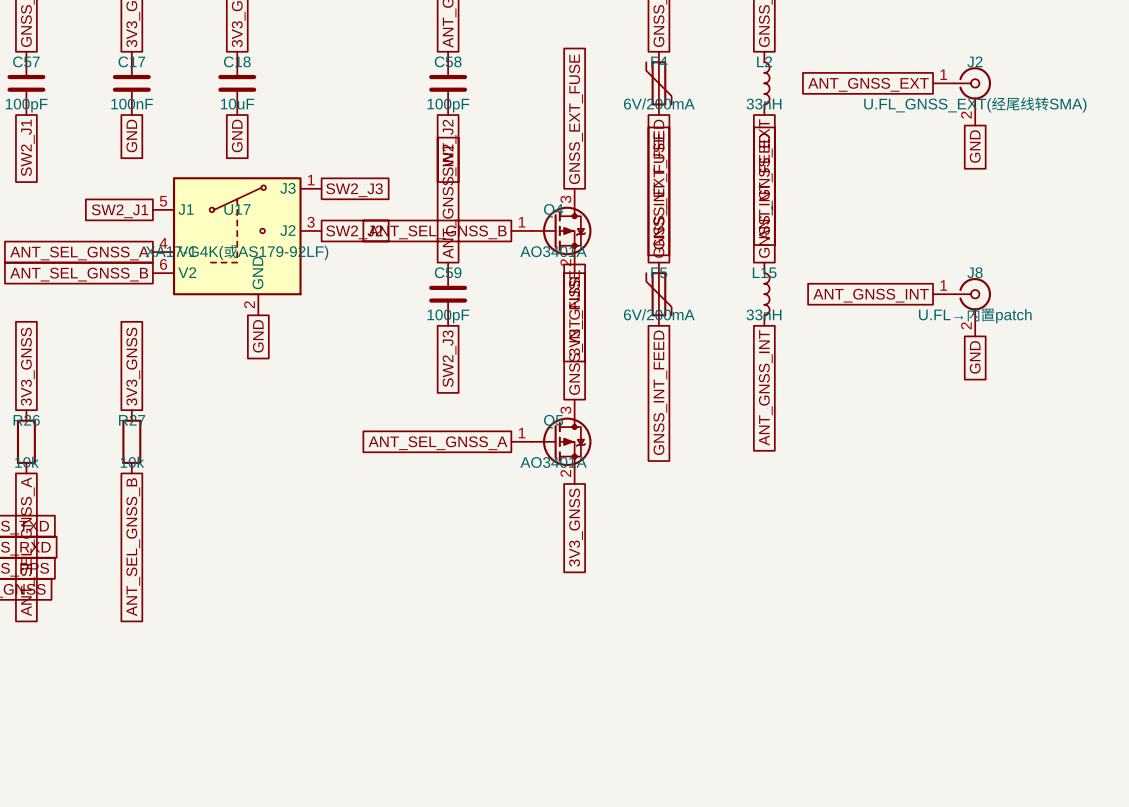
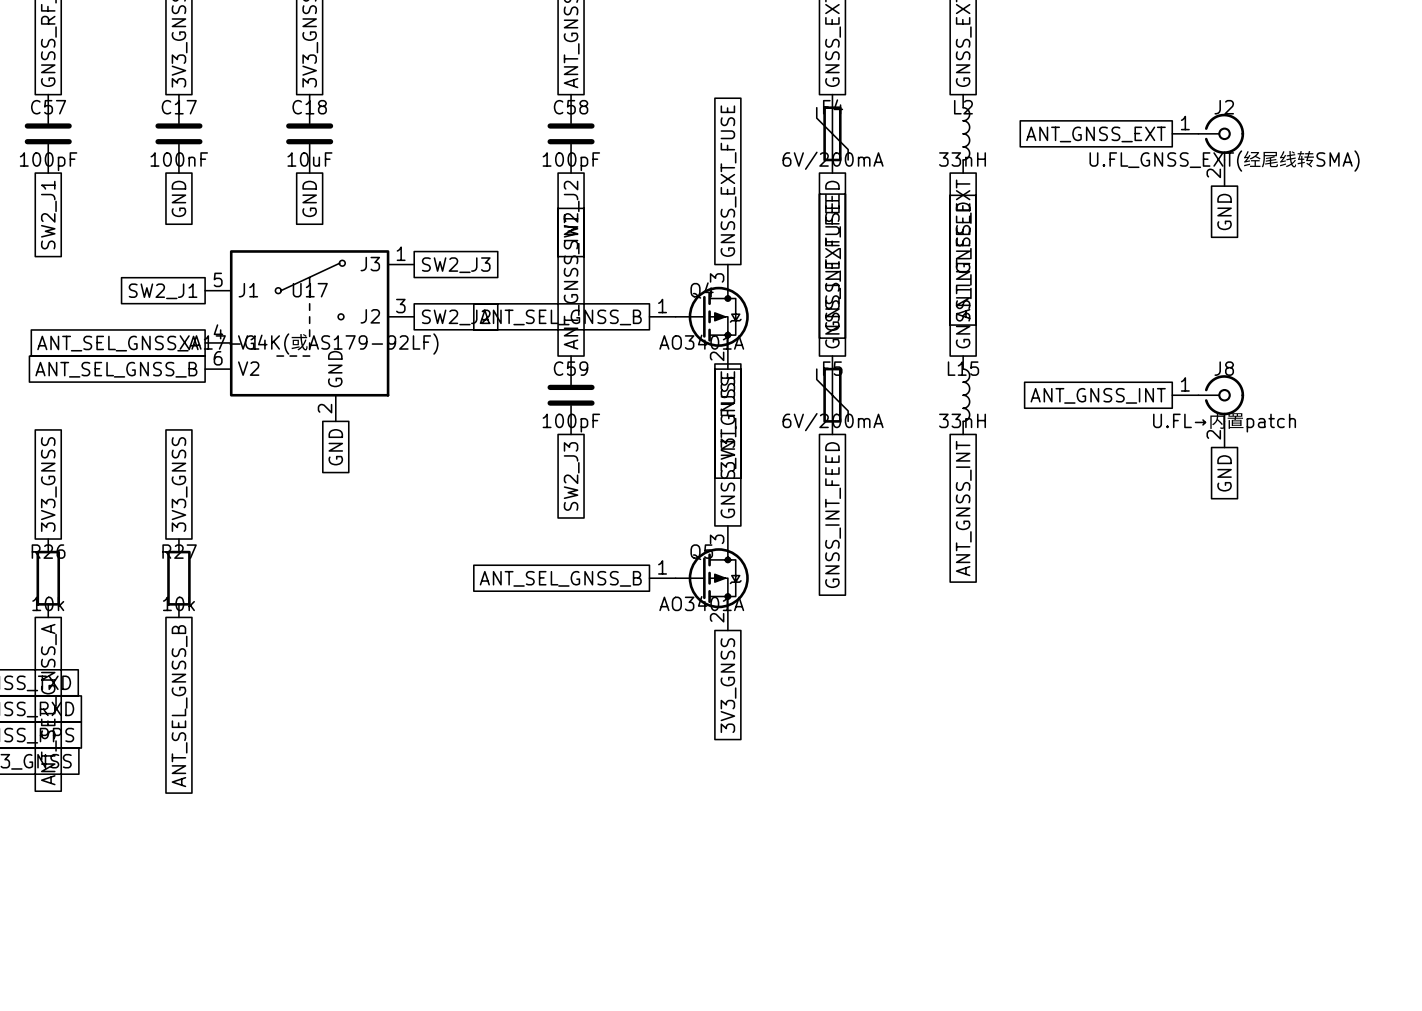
global label: ANT_SEL_GNSS_A (437, 443) -> ANT_SEL_GNSS_B (560, 578)

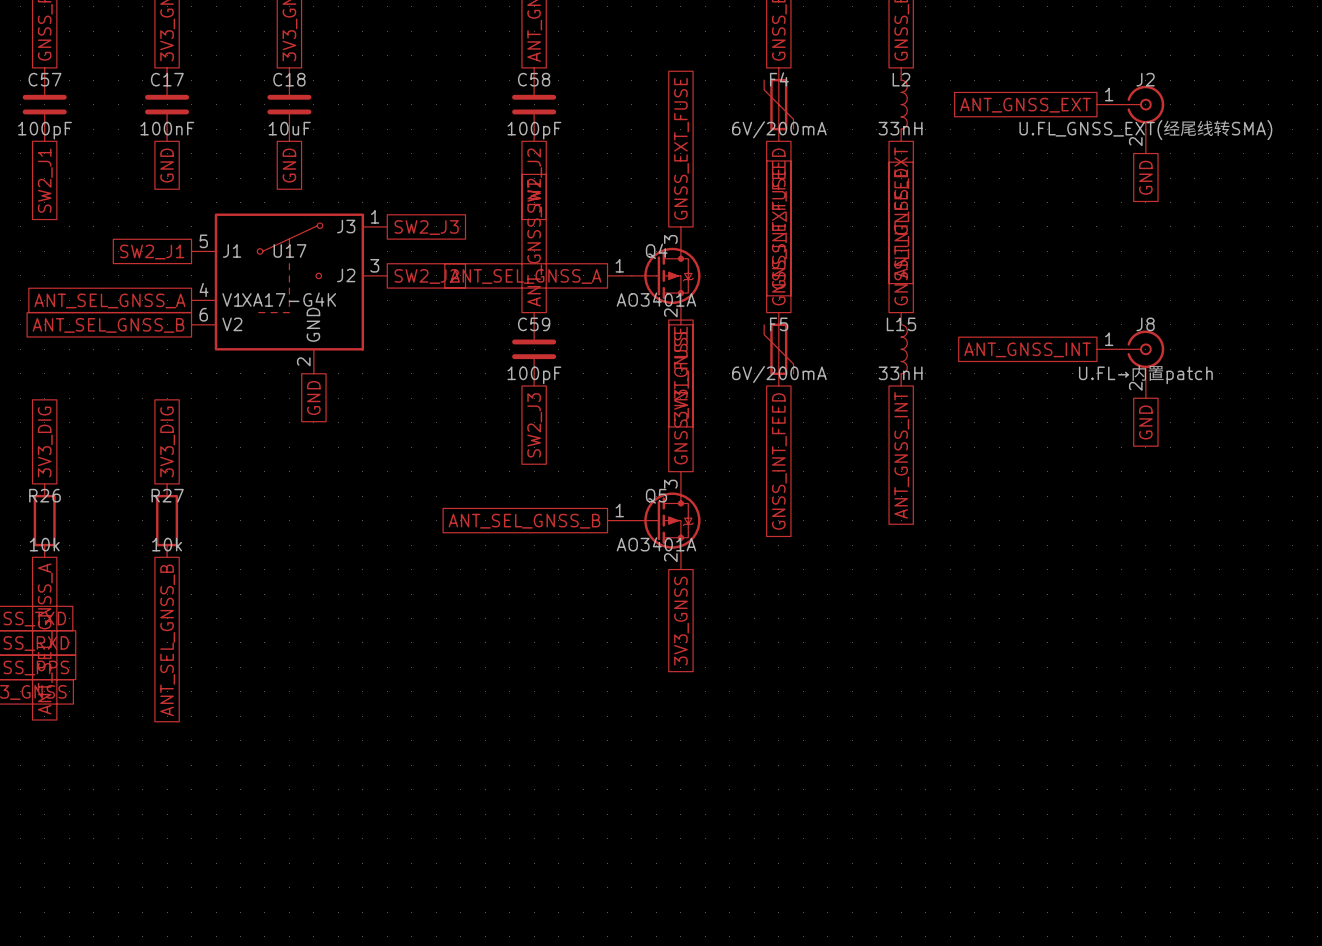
global label: ANT_SEL_GNSS_B (560, 317) -> ANT_SEL_GNSS_A (525, 276)
U17 value: XA17-G4K(或AS179-92LF) (309, 344) -> XA17-G4K (289, 299)
global label: 3V3_GNSS (48, 484) -> 3V3_DIG (45, 441)
global label: 3V3_GNSS (179, 484) -> 3V3_DIG (167, 441)

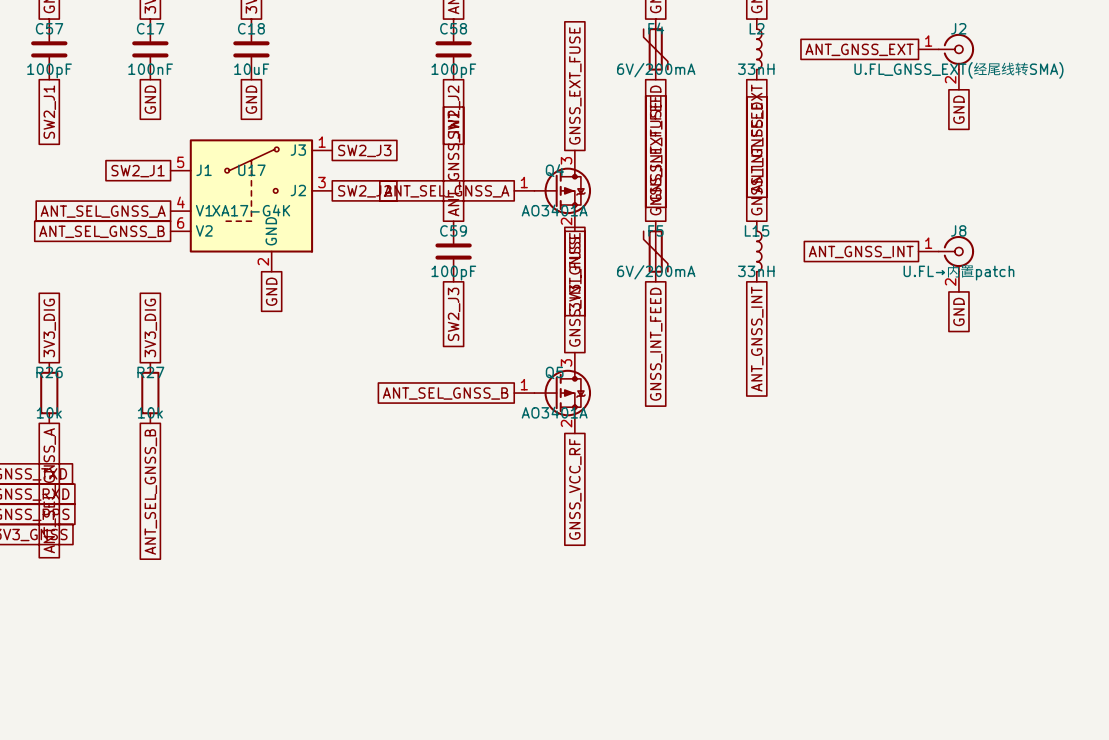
global label: 3V3_GNSS (681, 621) -> GNSS_VCC_RF (575, 489)

